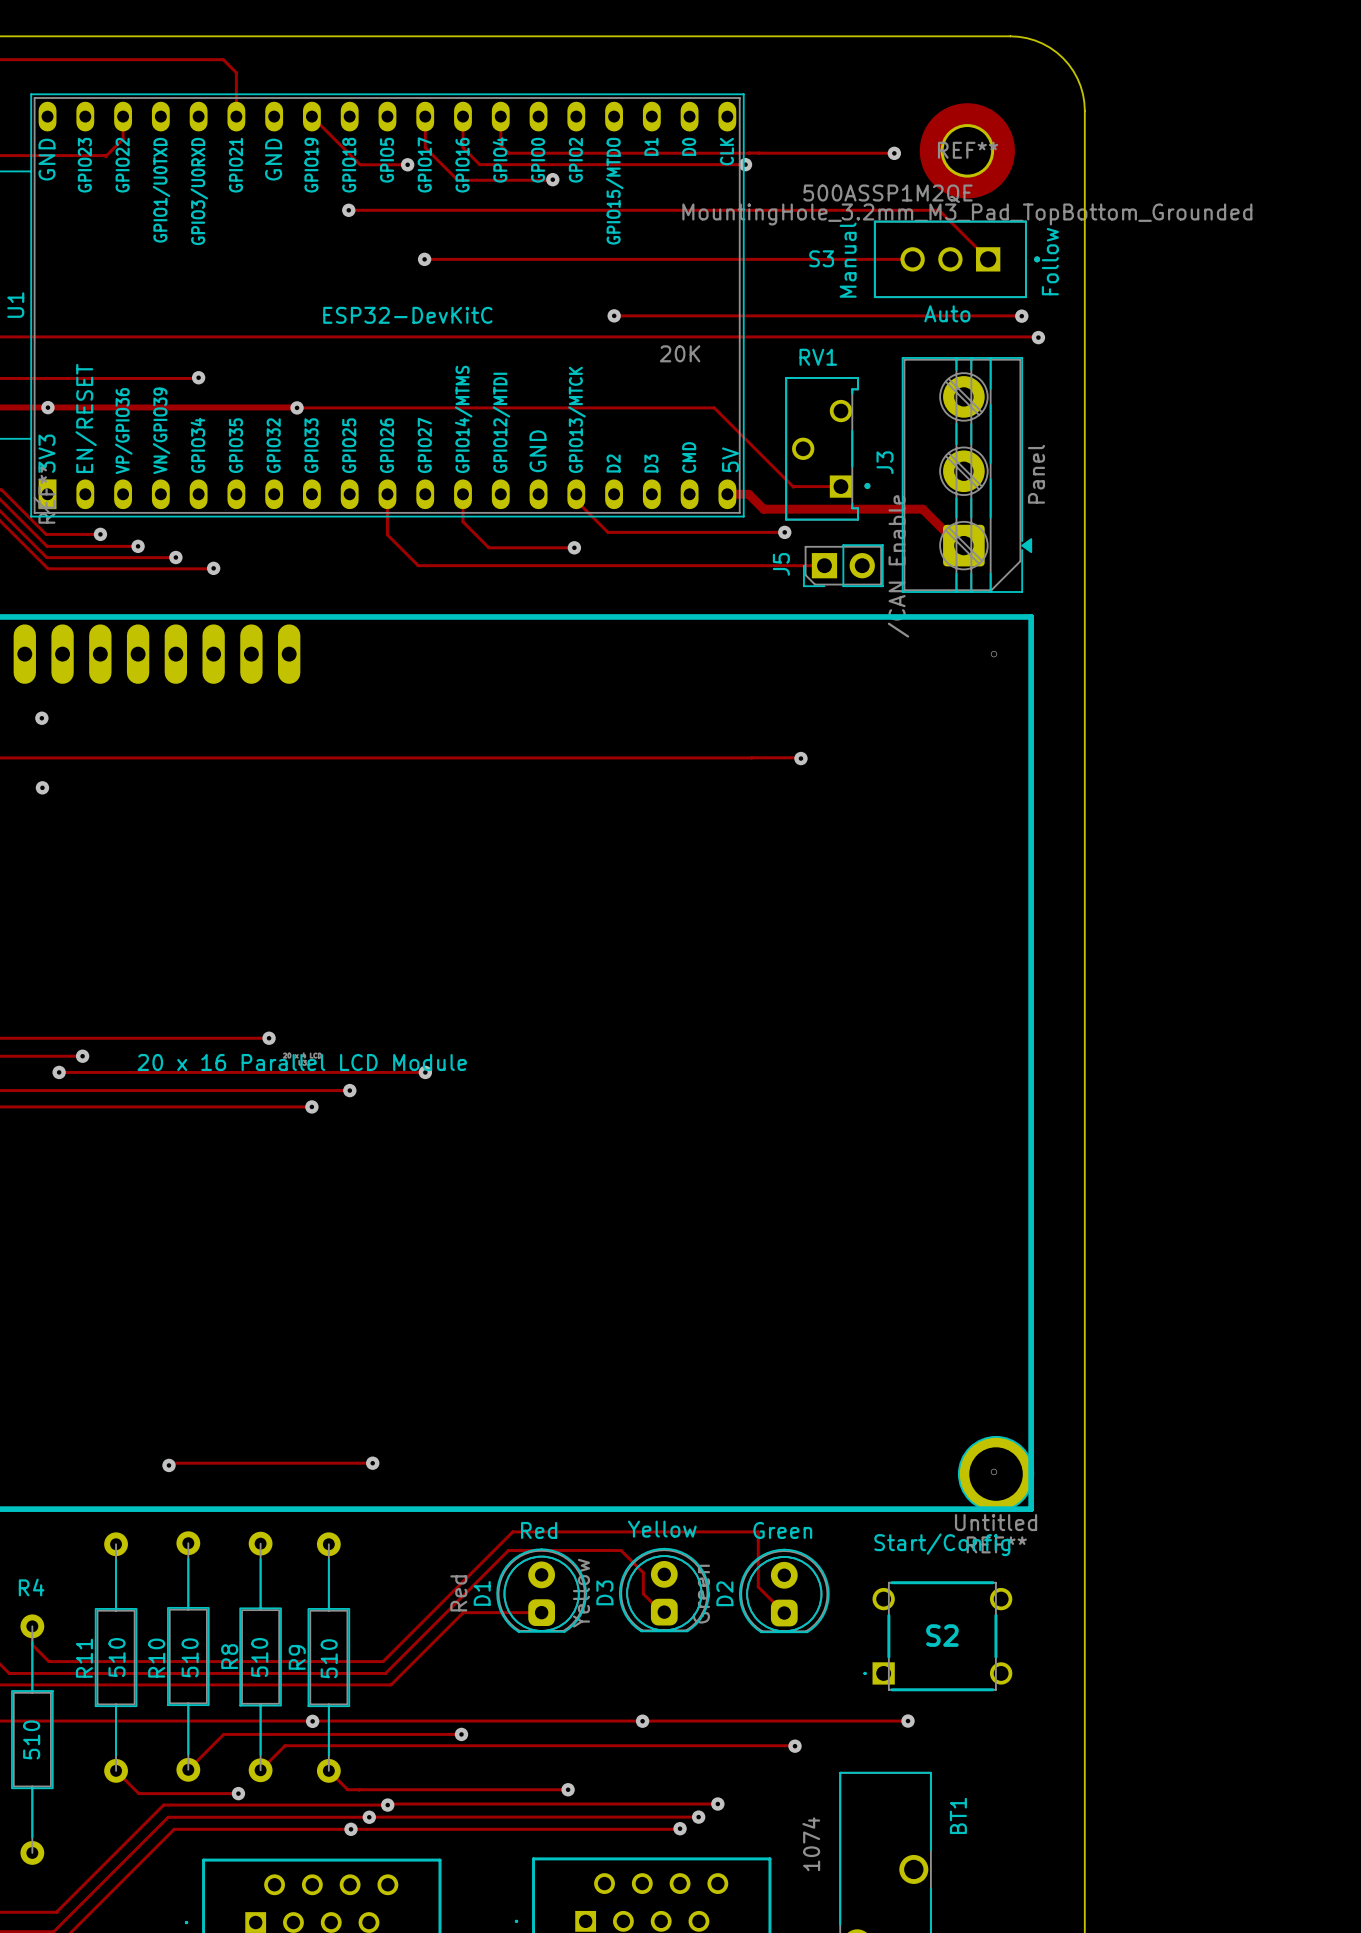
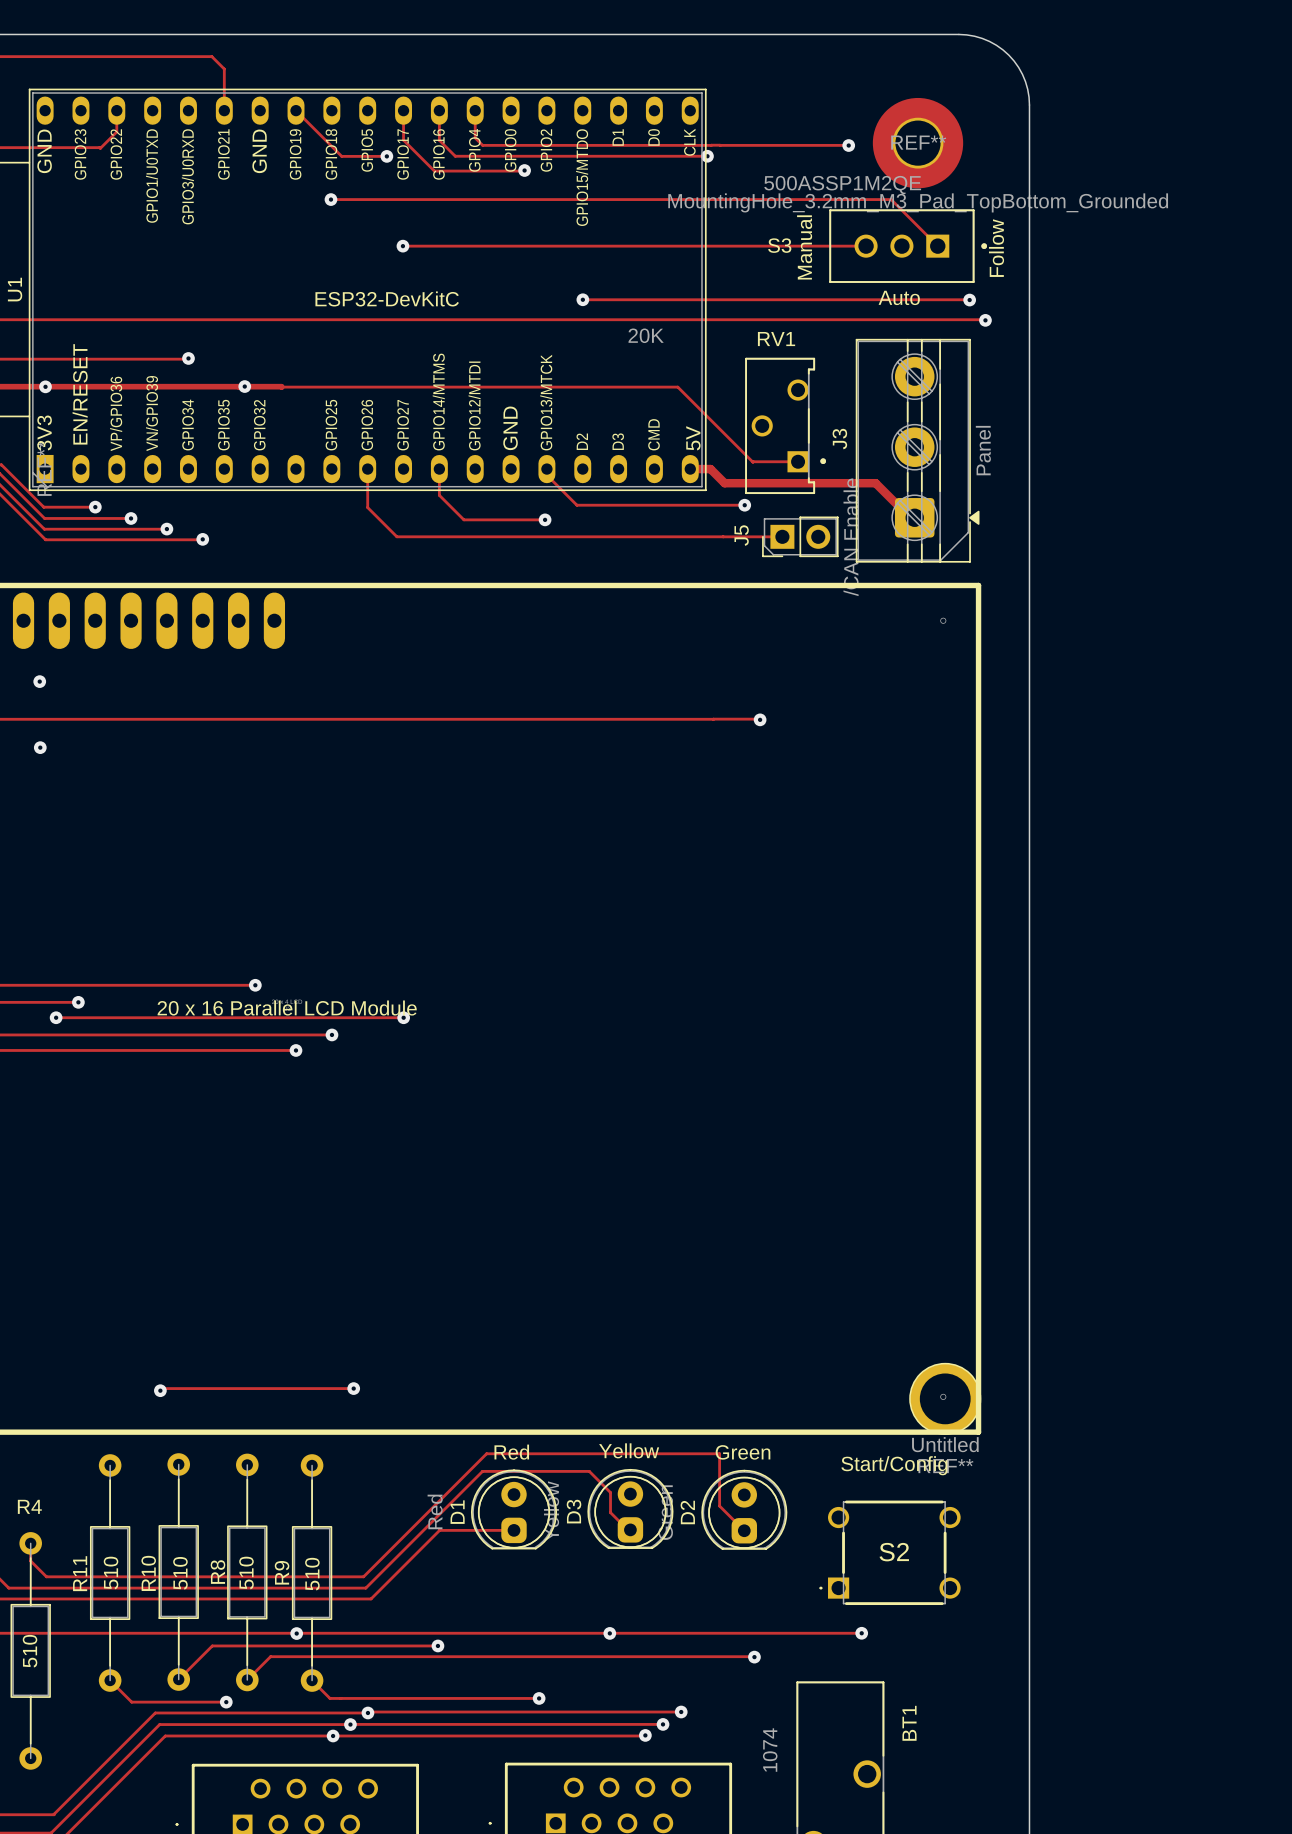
via position: (297, 407) -> (244, 386)
U1 text: GPIO33 (311, 445) -> none

